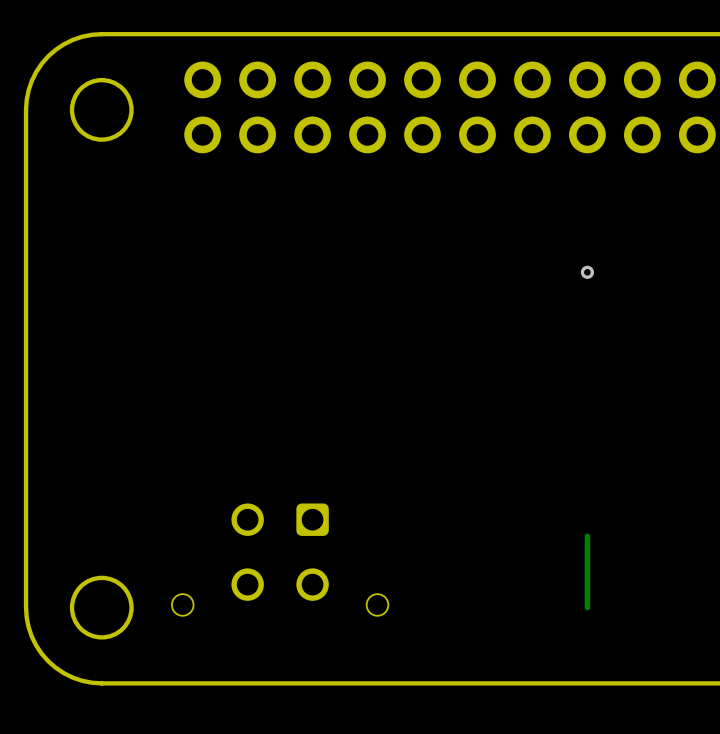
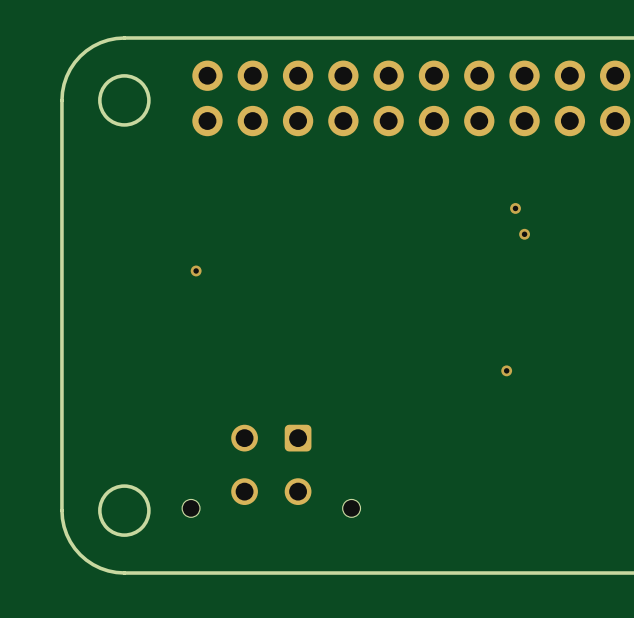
via: none -> (515, 208)
via: none -> (196, 270)
via: none -> (506, 370)
track: (587, 536) (587, 607) -> none

